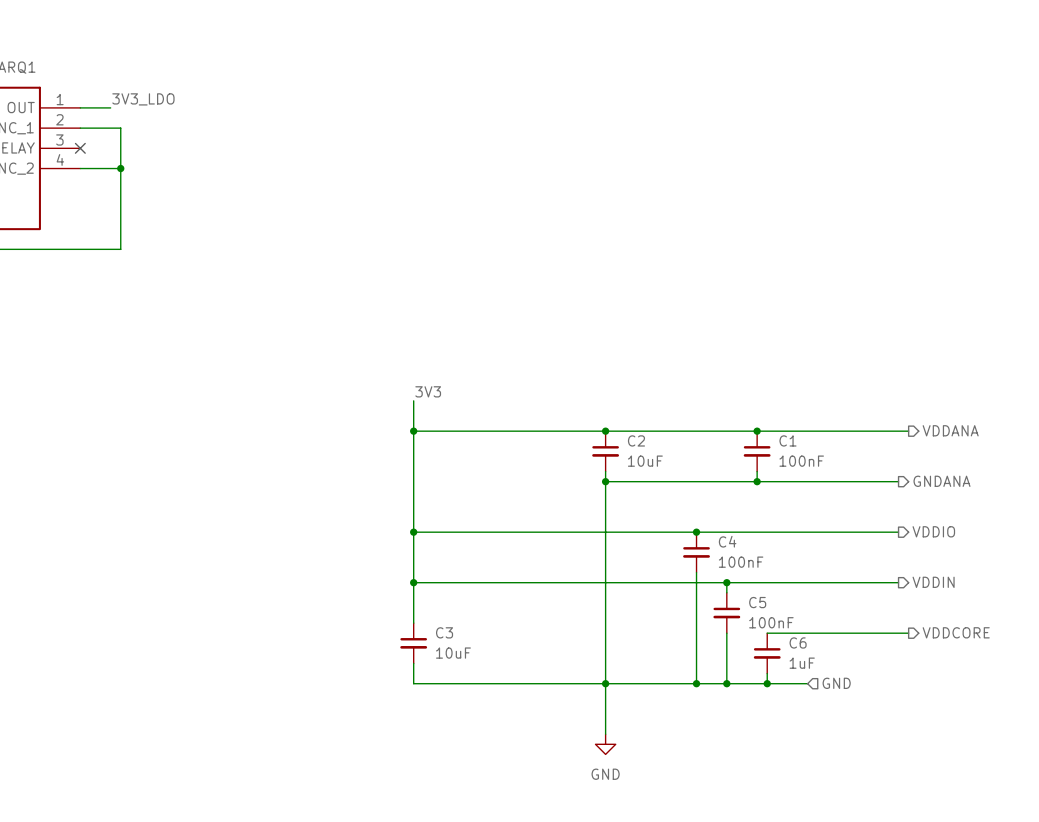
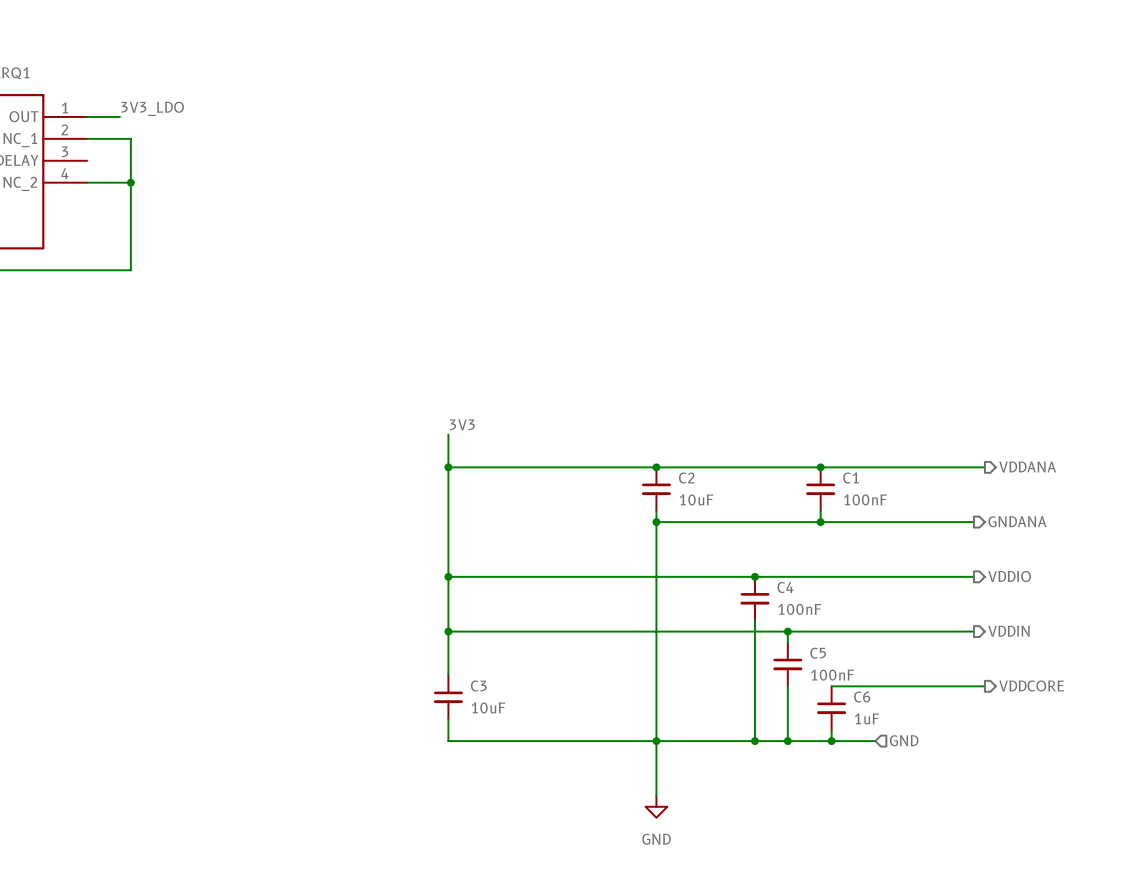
no-connect mark: (80, 148) -> none

